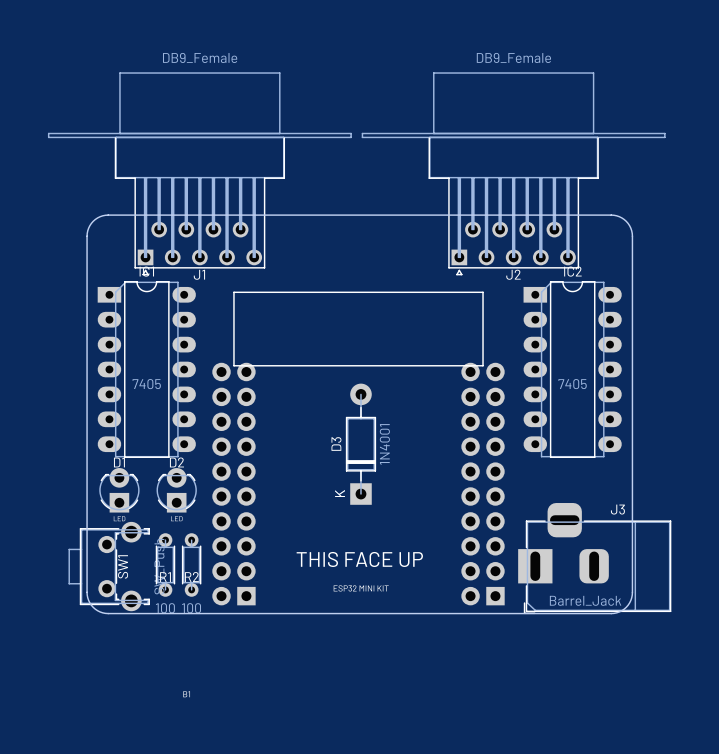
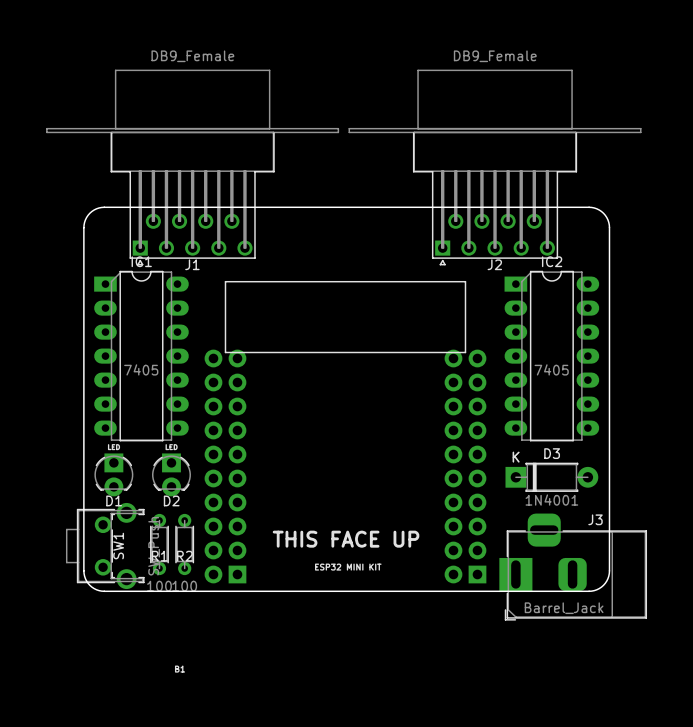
D3 footprint: [345, 383, 376, 505] -> [505, 462, 599, 492]
D3 name position: D3 (336, 444) -> D3 (552, 453)
D3 value position: 1N4001 (384, 444) -> 1N4001 (551, 500)
D1 rotation: 0° (119, 490) -> 180° (113, 474)
D2 rotation: 0° (176, 490) -> 180° (171, 474)
J3 position: (594, 558) -> (573, 566)

